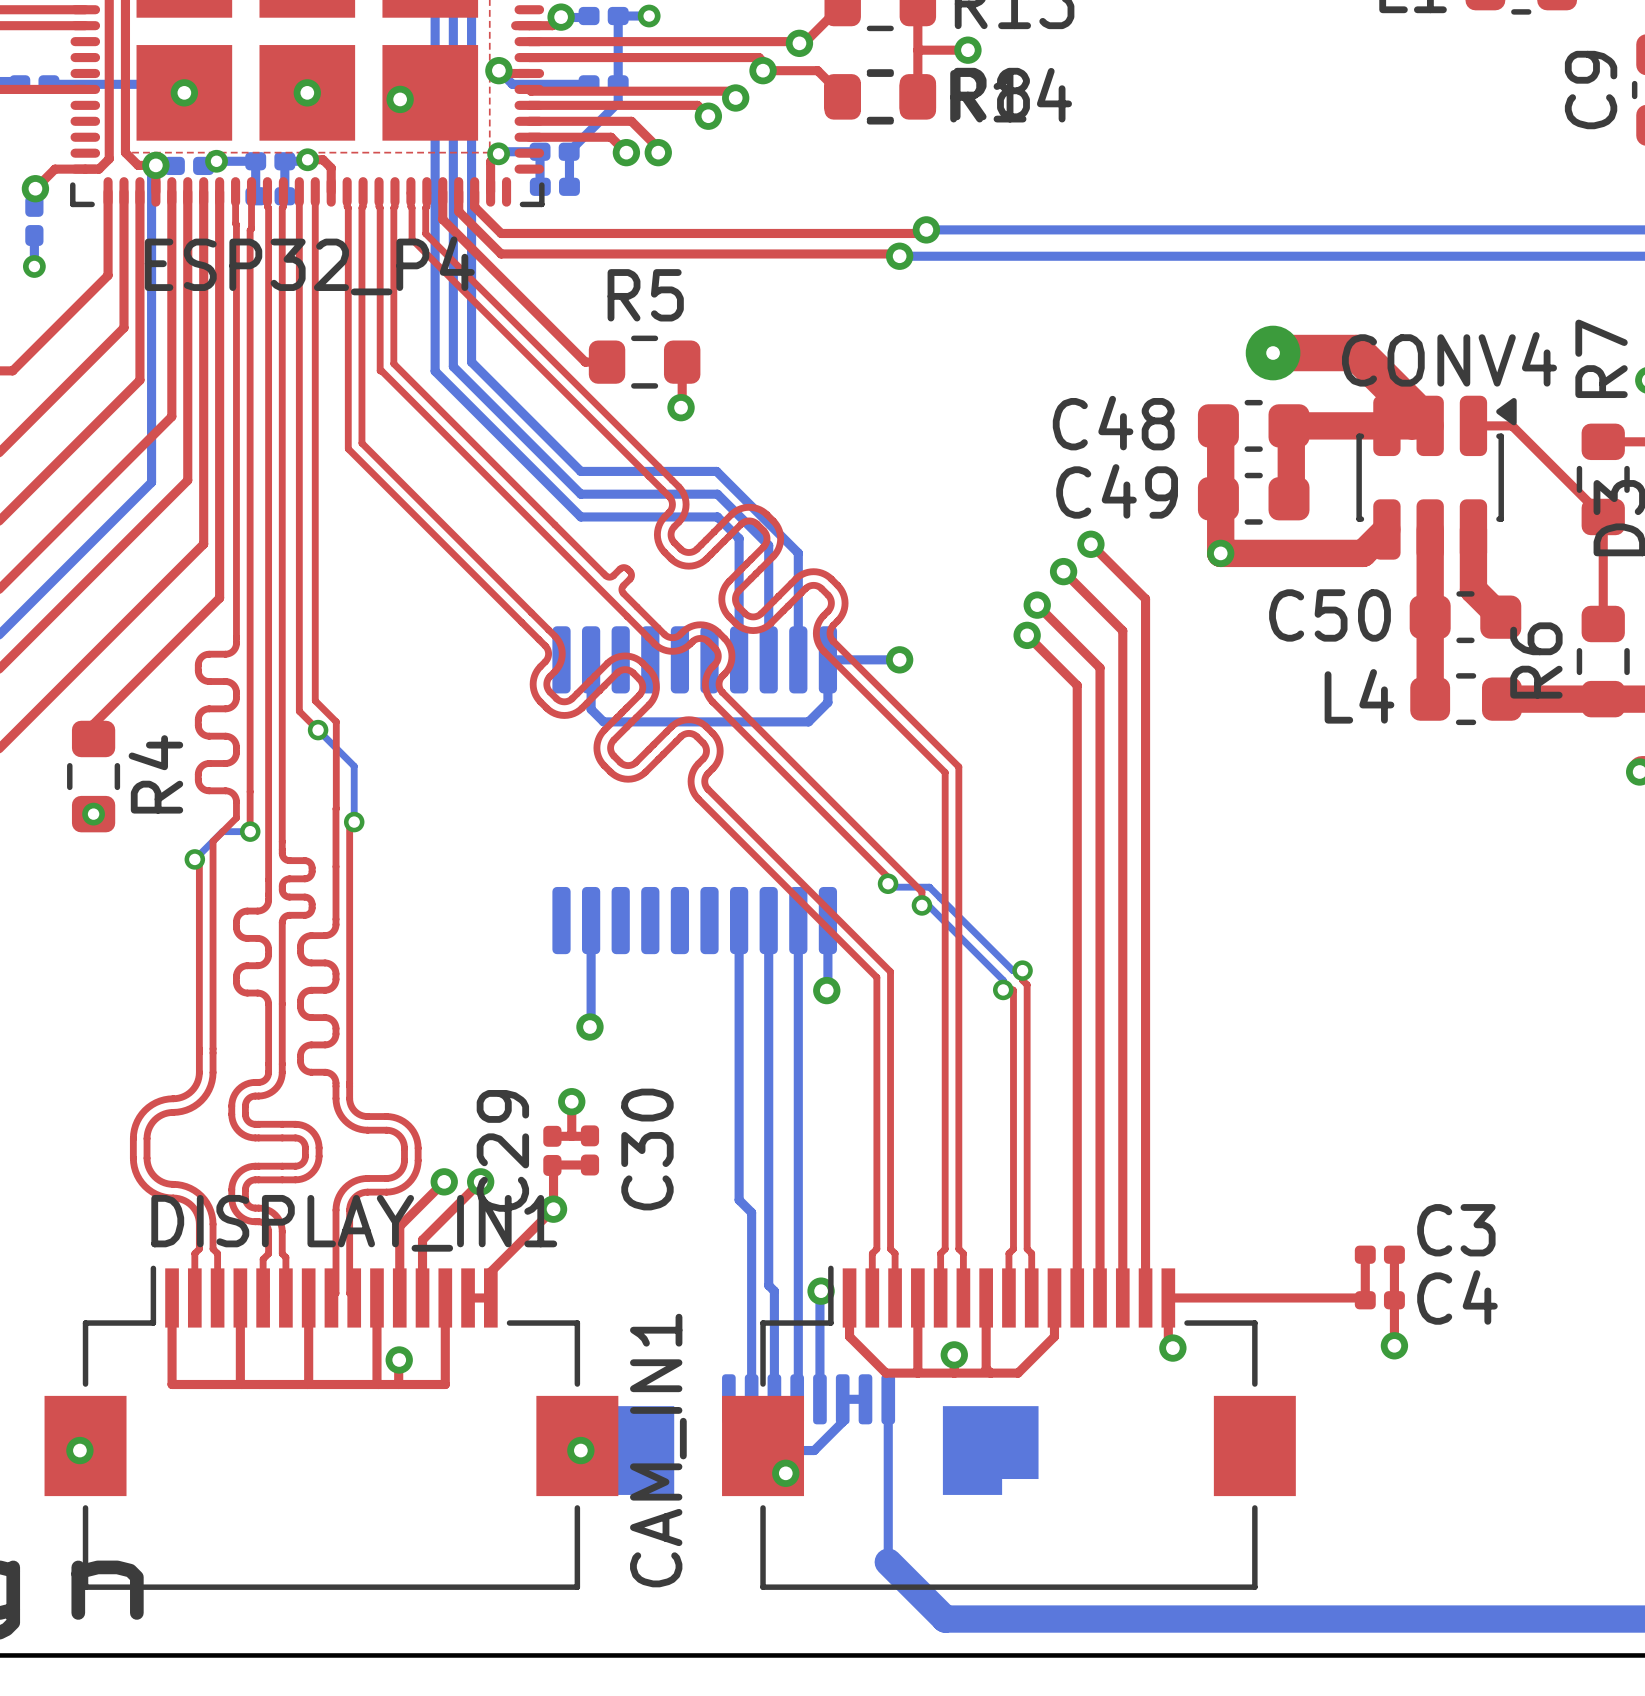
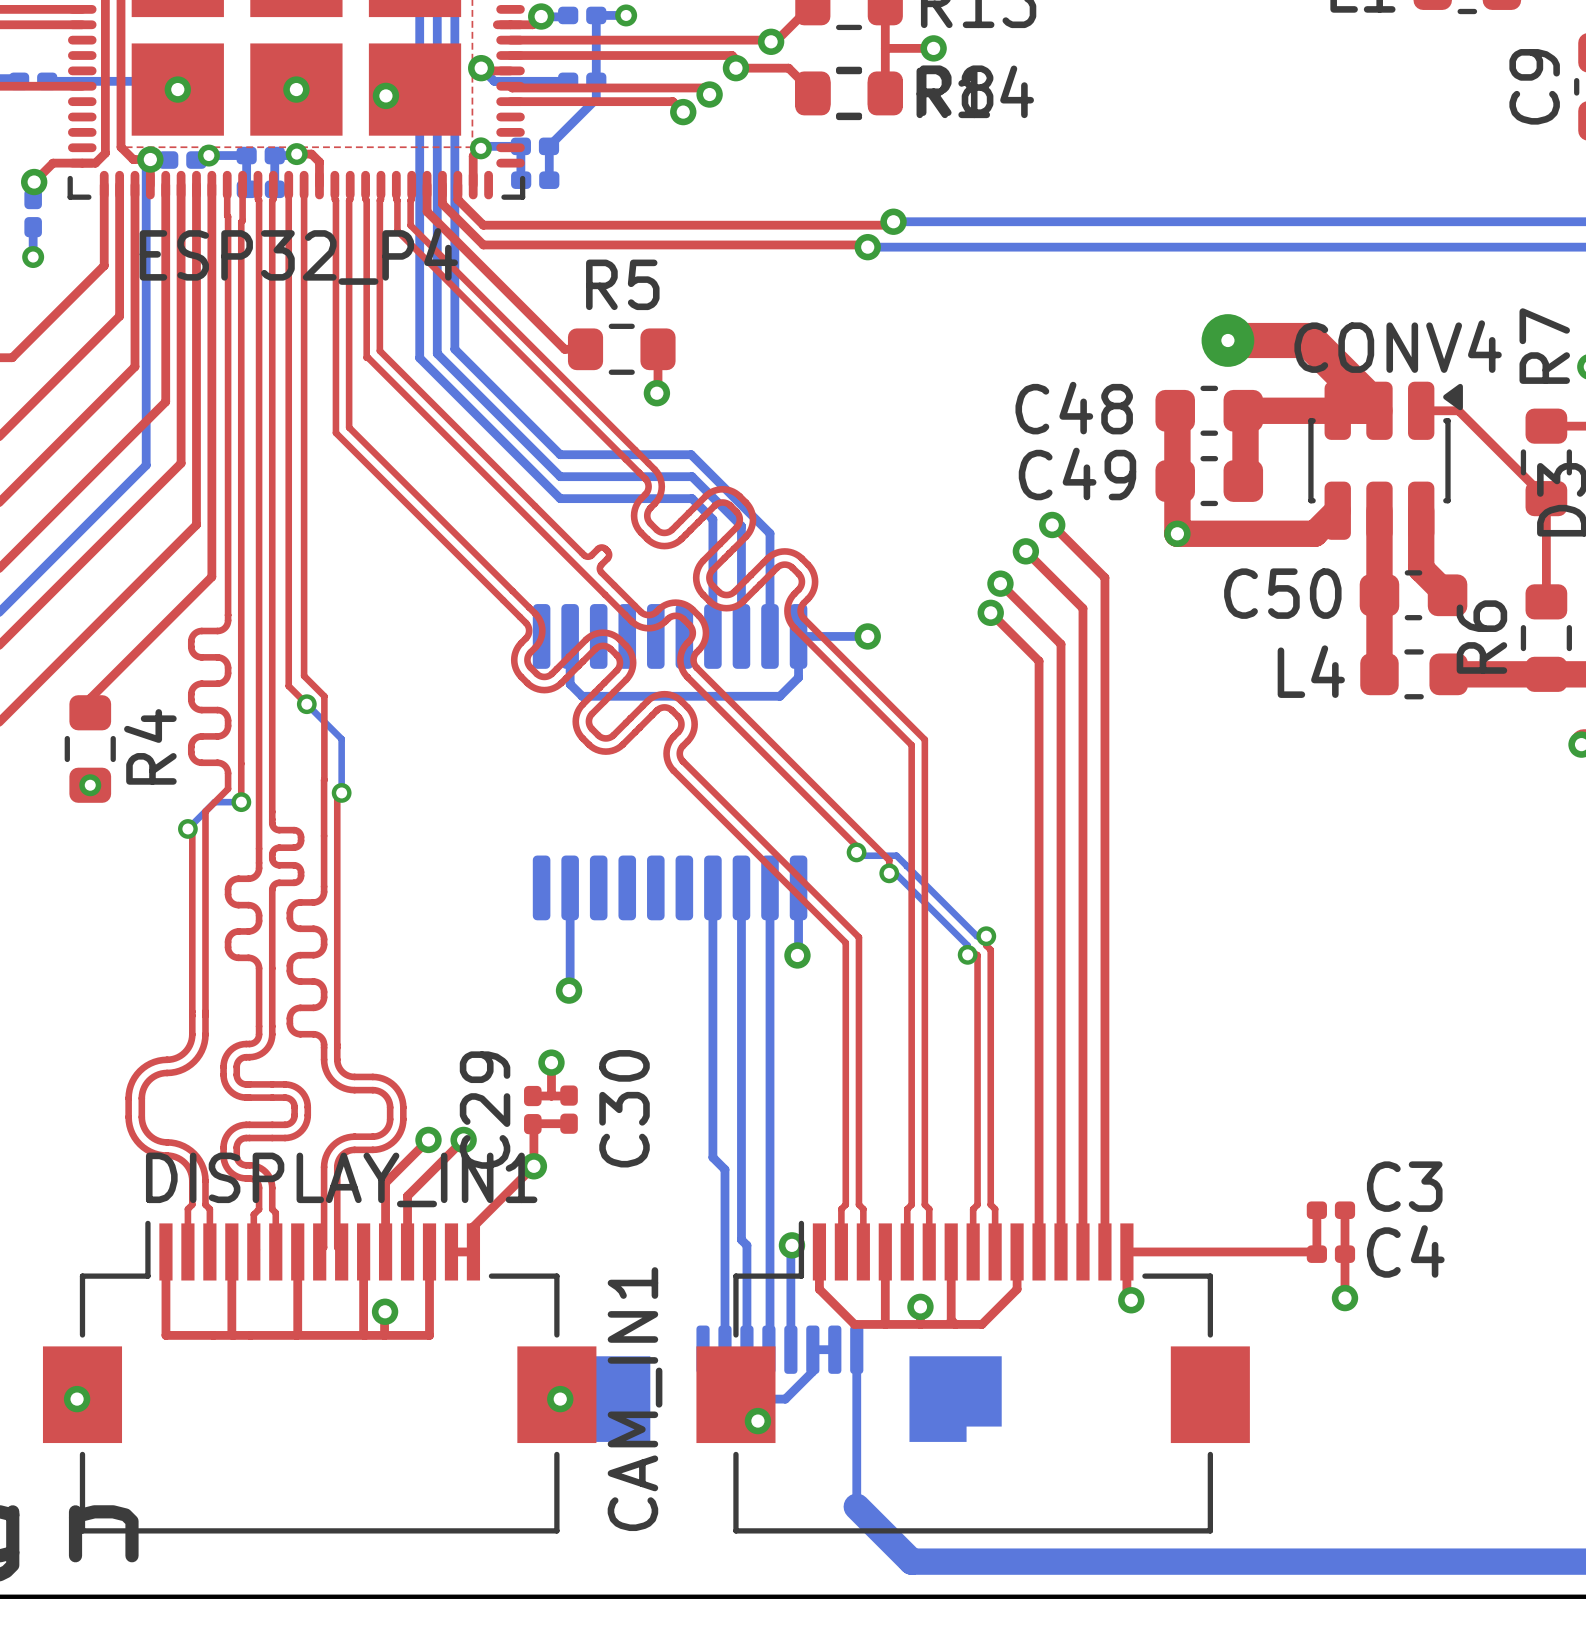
top track: (529, 121) (631, 121) (658, 148) (658, 152) -> none
top track: (529, 137) (611, 137) (626, 152) -> none
via: (626, 152) -> none
via: (658, 152) -> none

